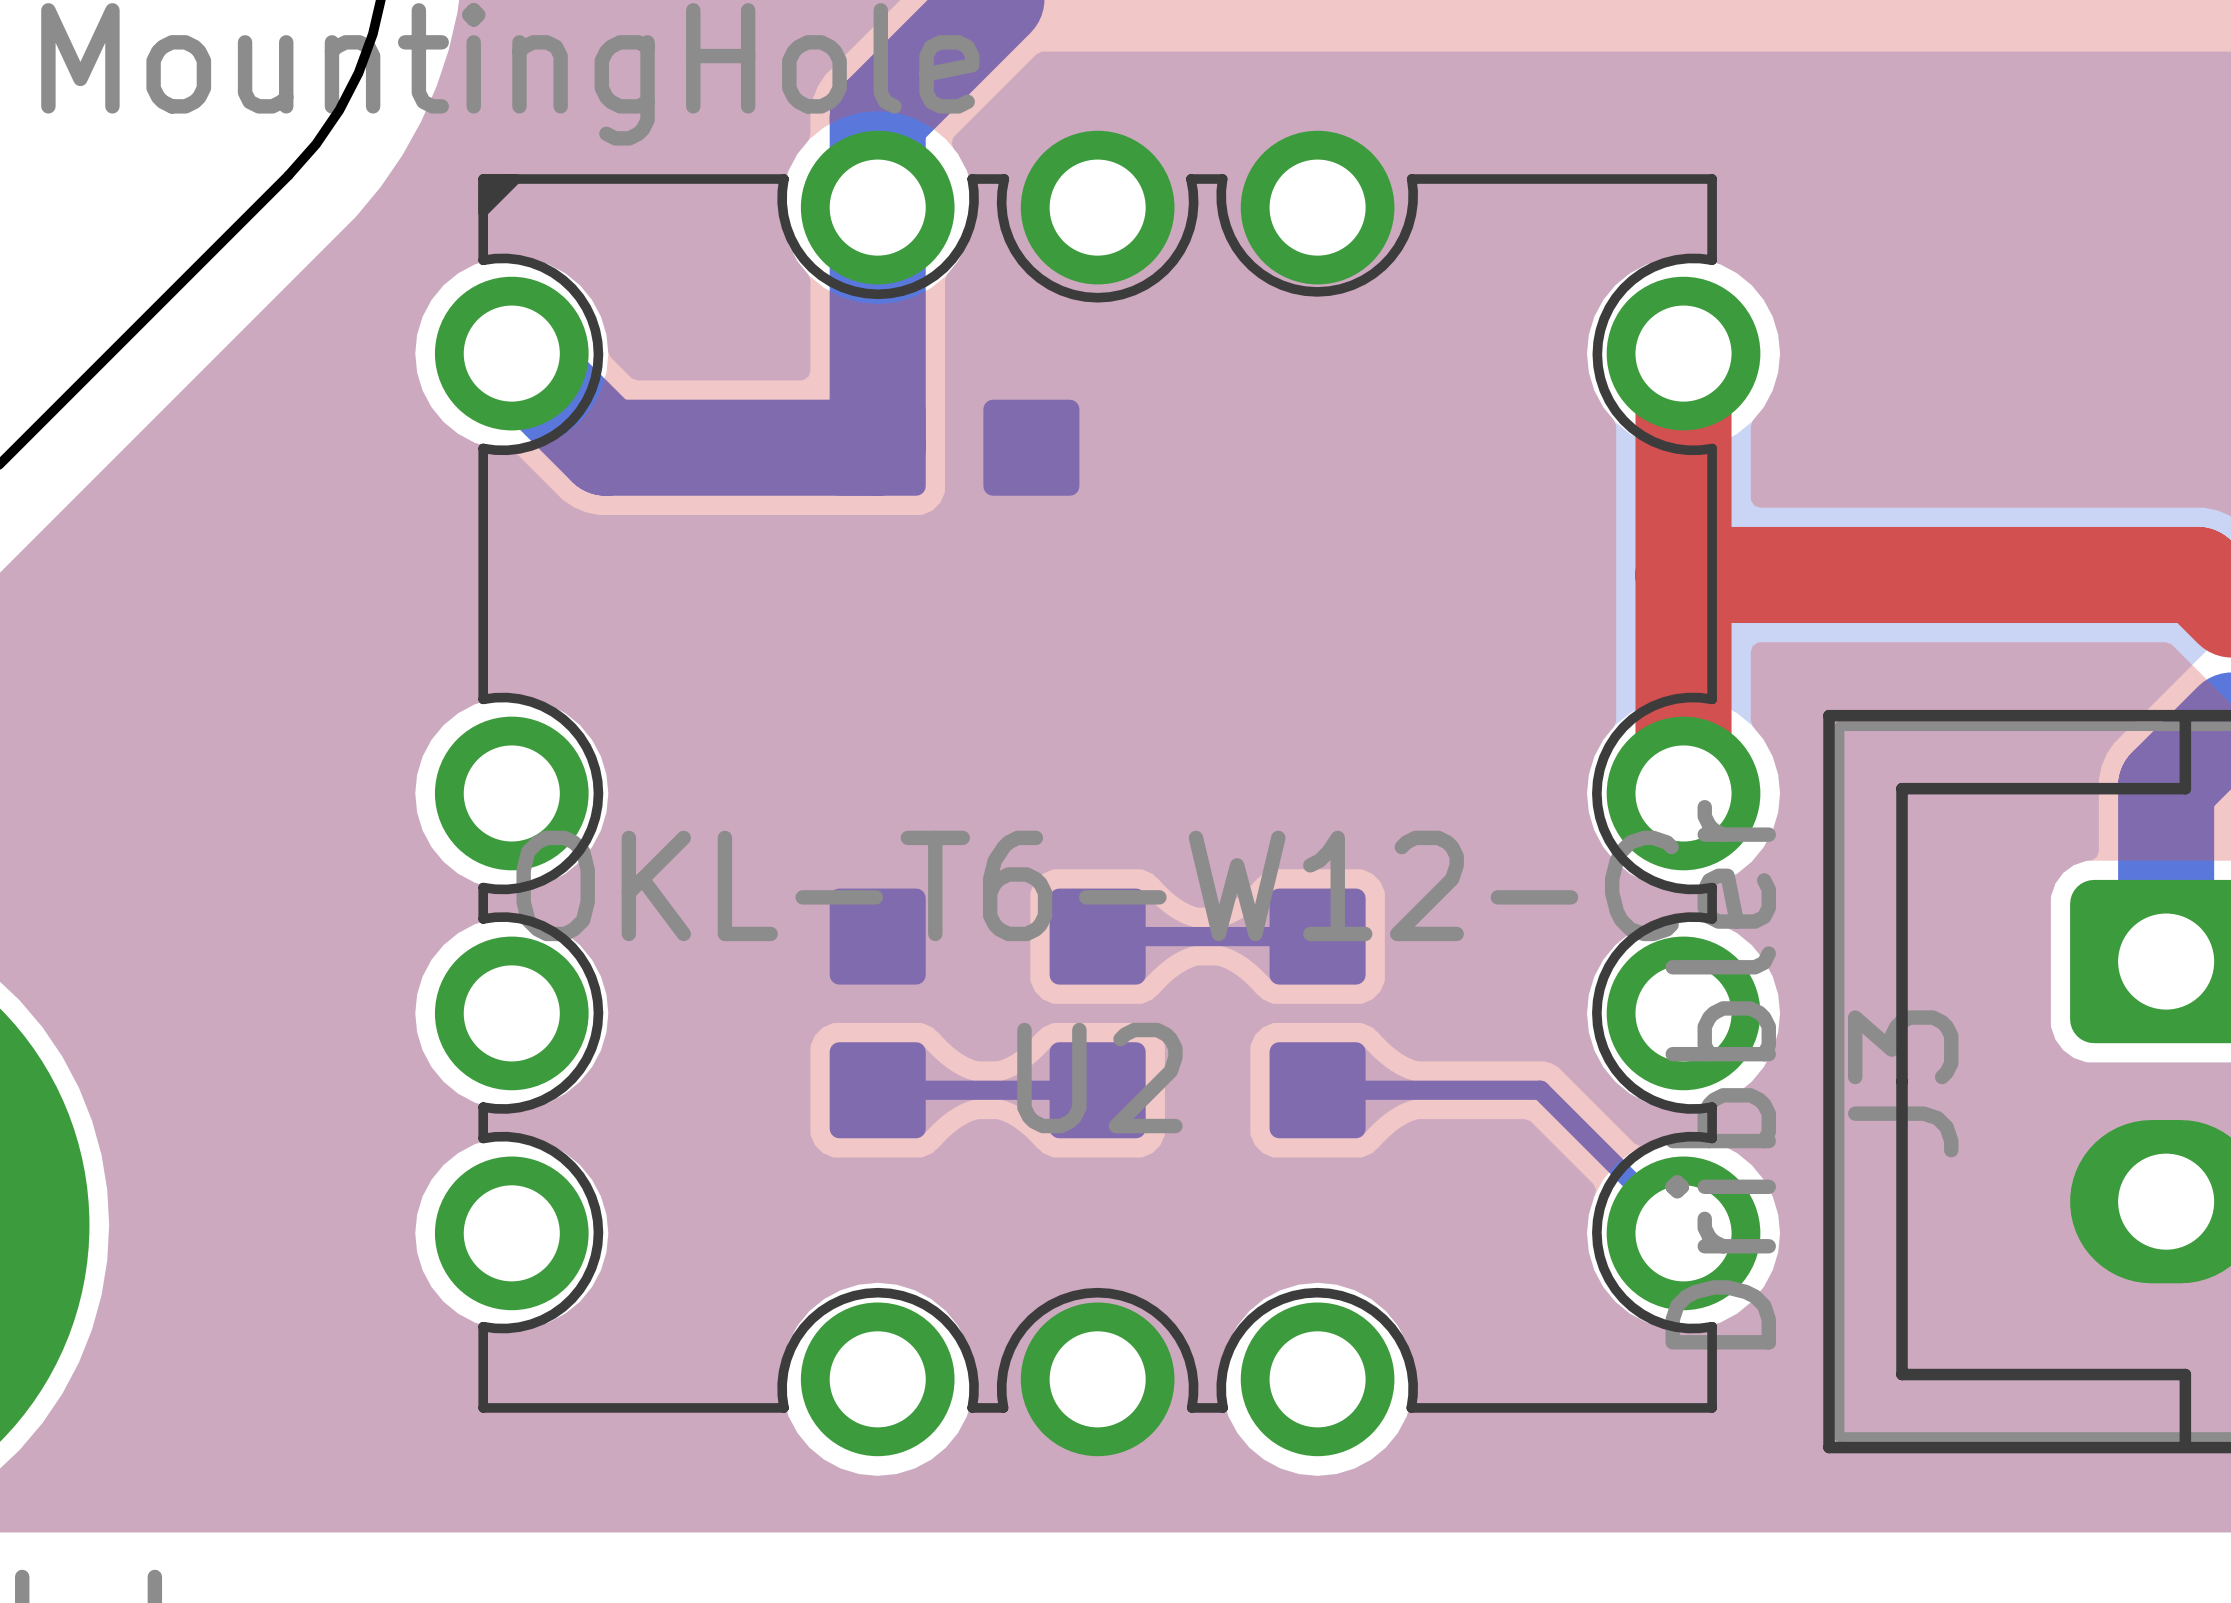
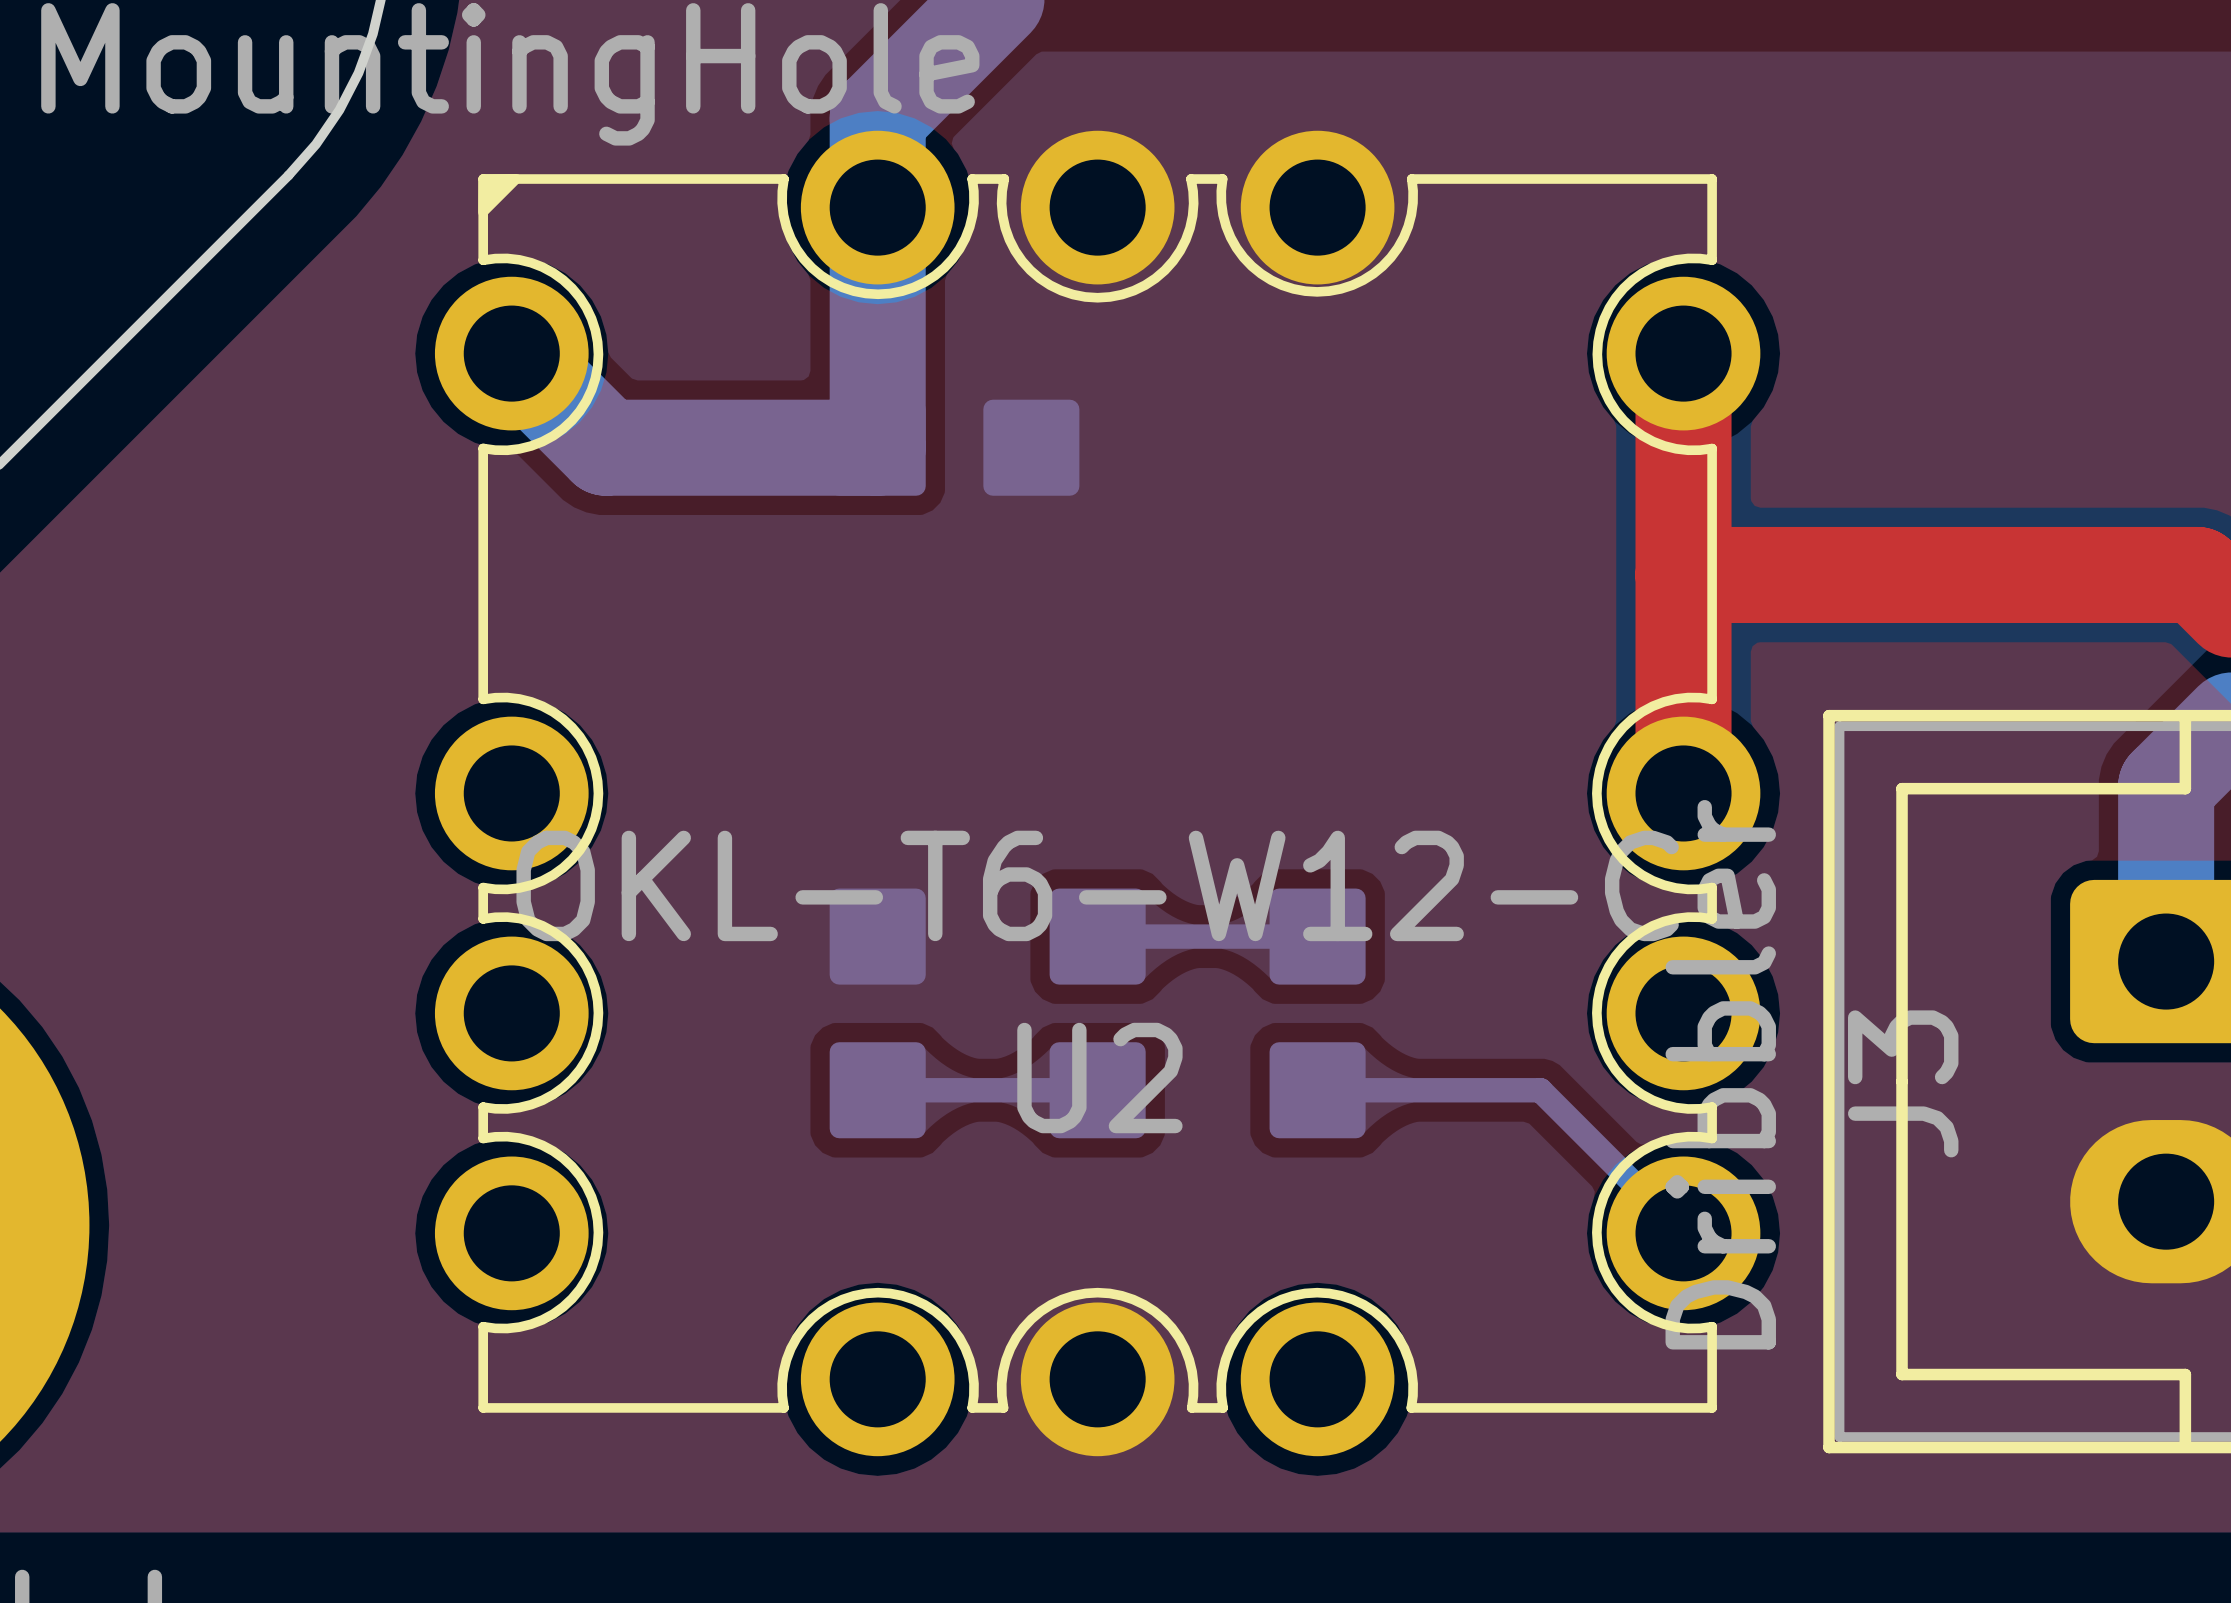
bottom track width: thin (1097, 936) (1317, 936) -> thick (1097, 936) (1317, 936)
bottom track width: thin (877, 1090) (1097, 1090) -> thick (877, 1090) (1097, 1090)
bottom track width: thin (1317, 1090) (1540, 1090) (1683, 1233) -> thick (1317, 1090) (1540, 1090) (1683, 1233)

